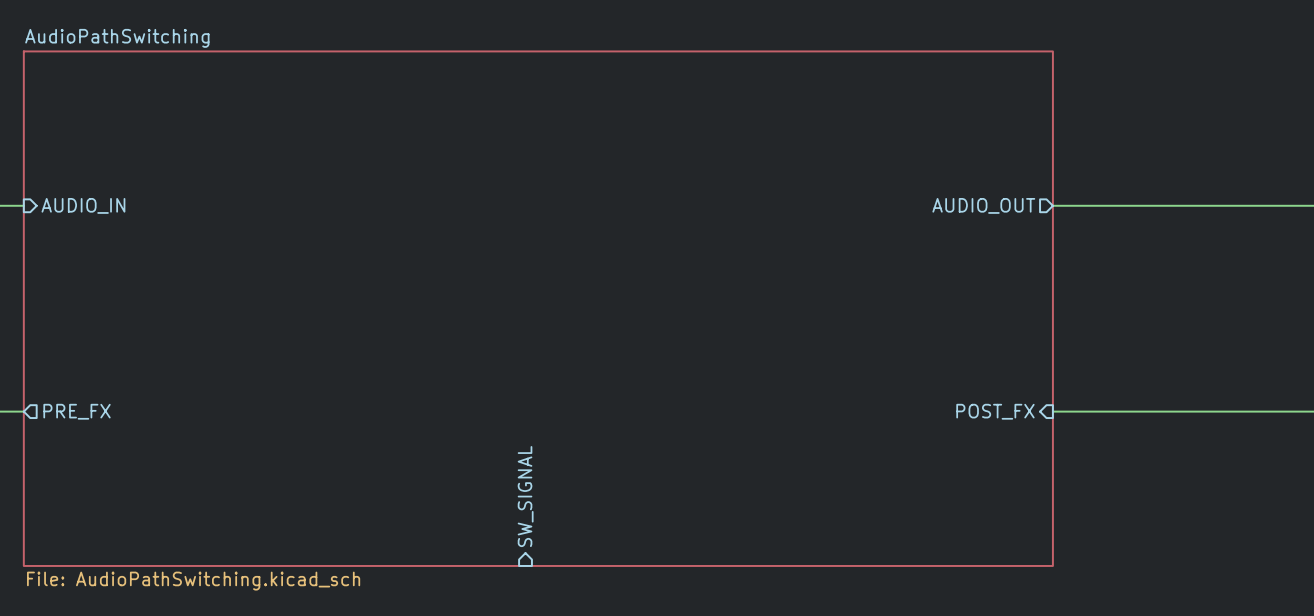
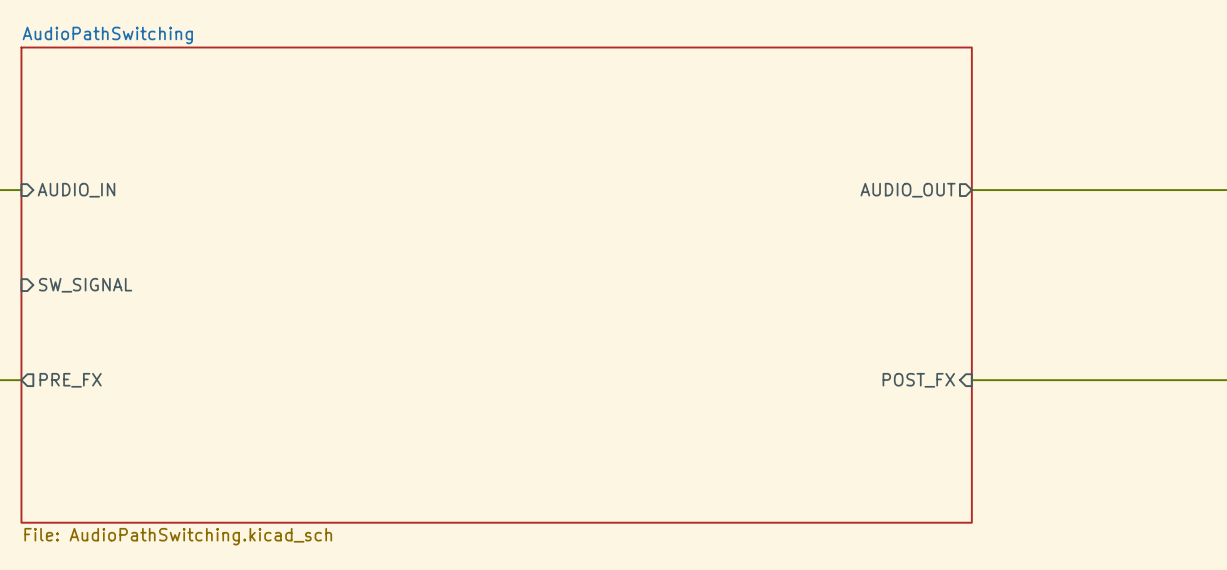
sheet pin: none -> SW_SIGNAL (85, 285)
sheet pin: SW_SIGNAL (525, 496) -> none

